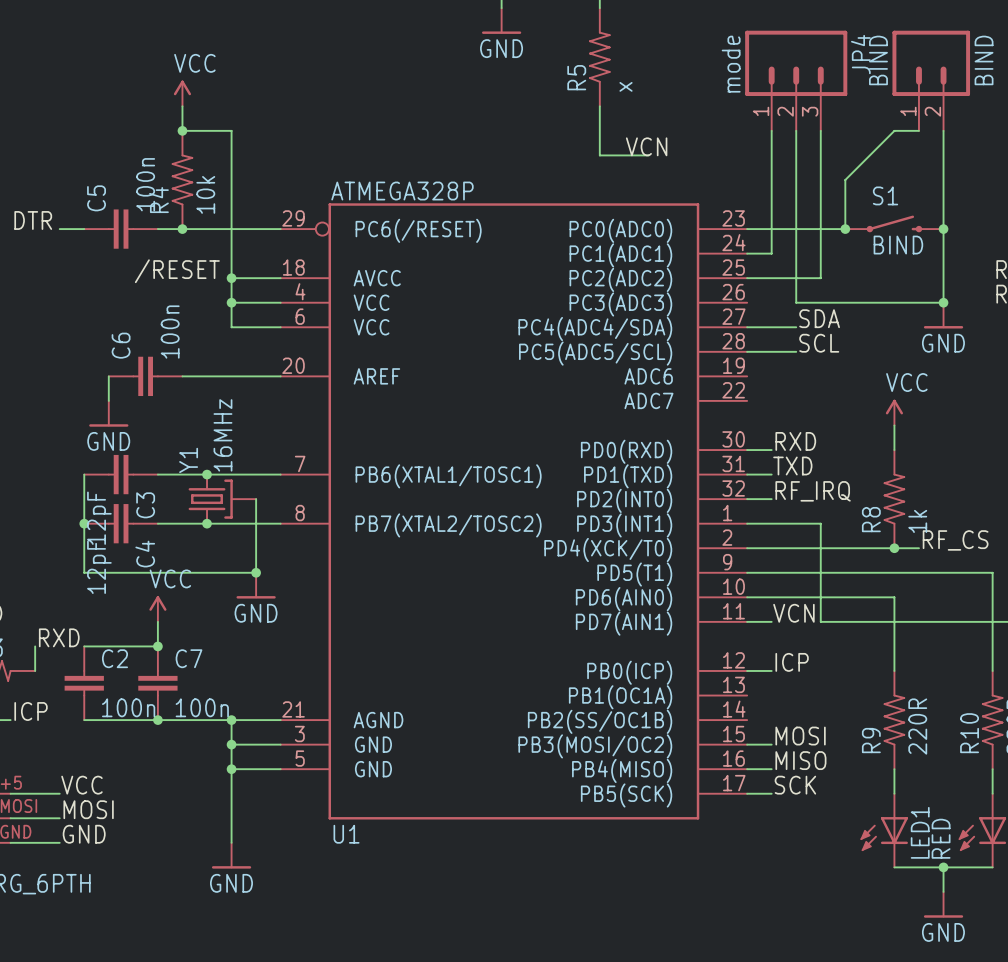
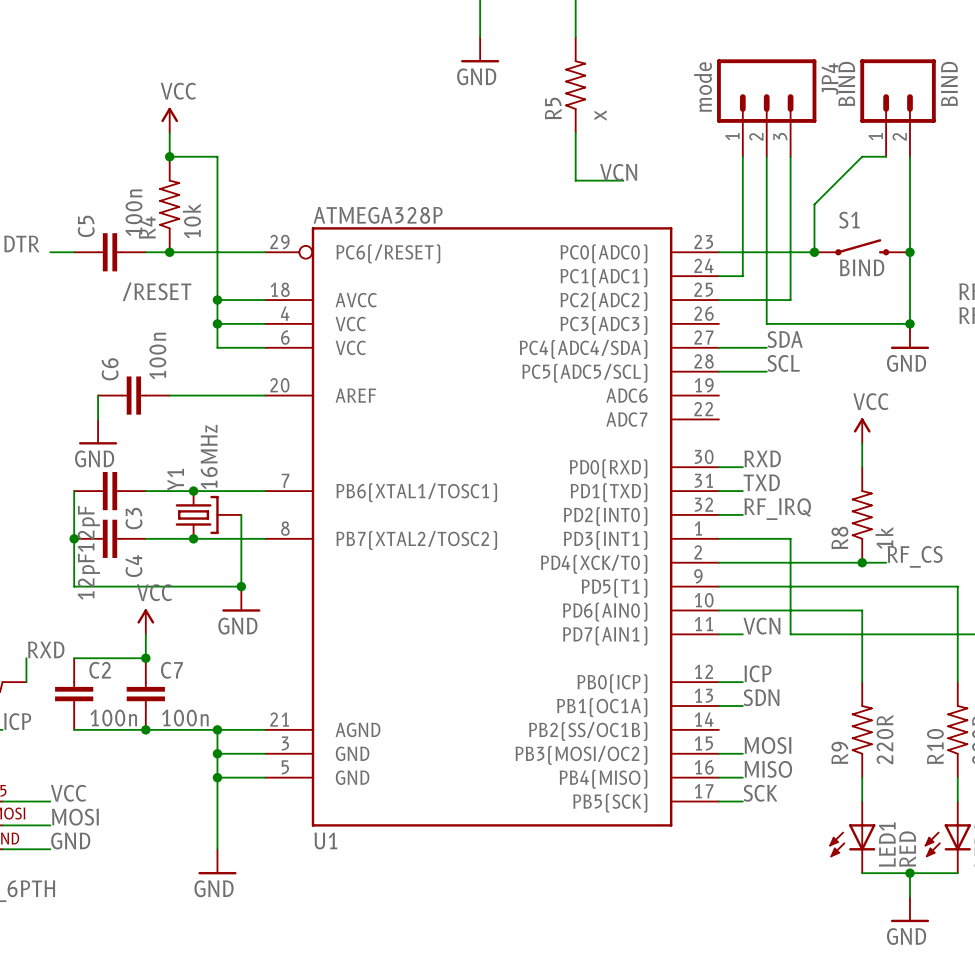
label: none -> SDN (761, 697)
wire: none -> (718, 706) (742, 706)

